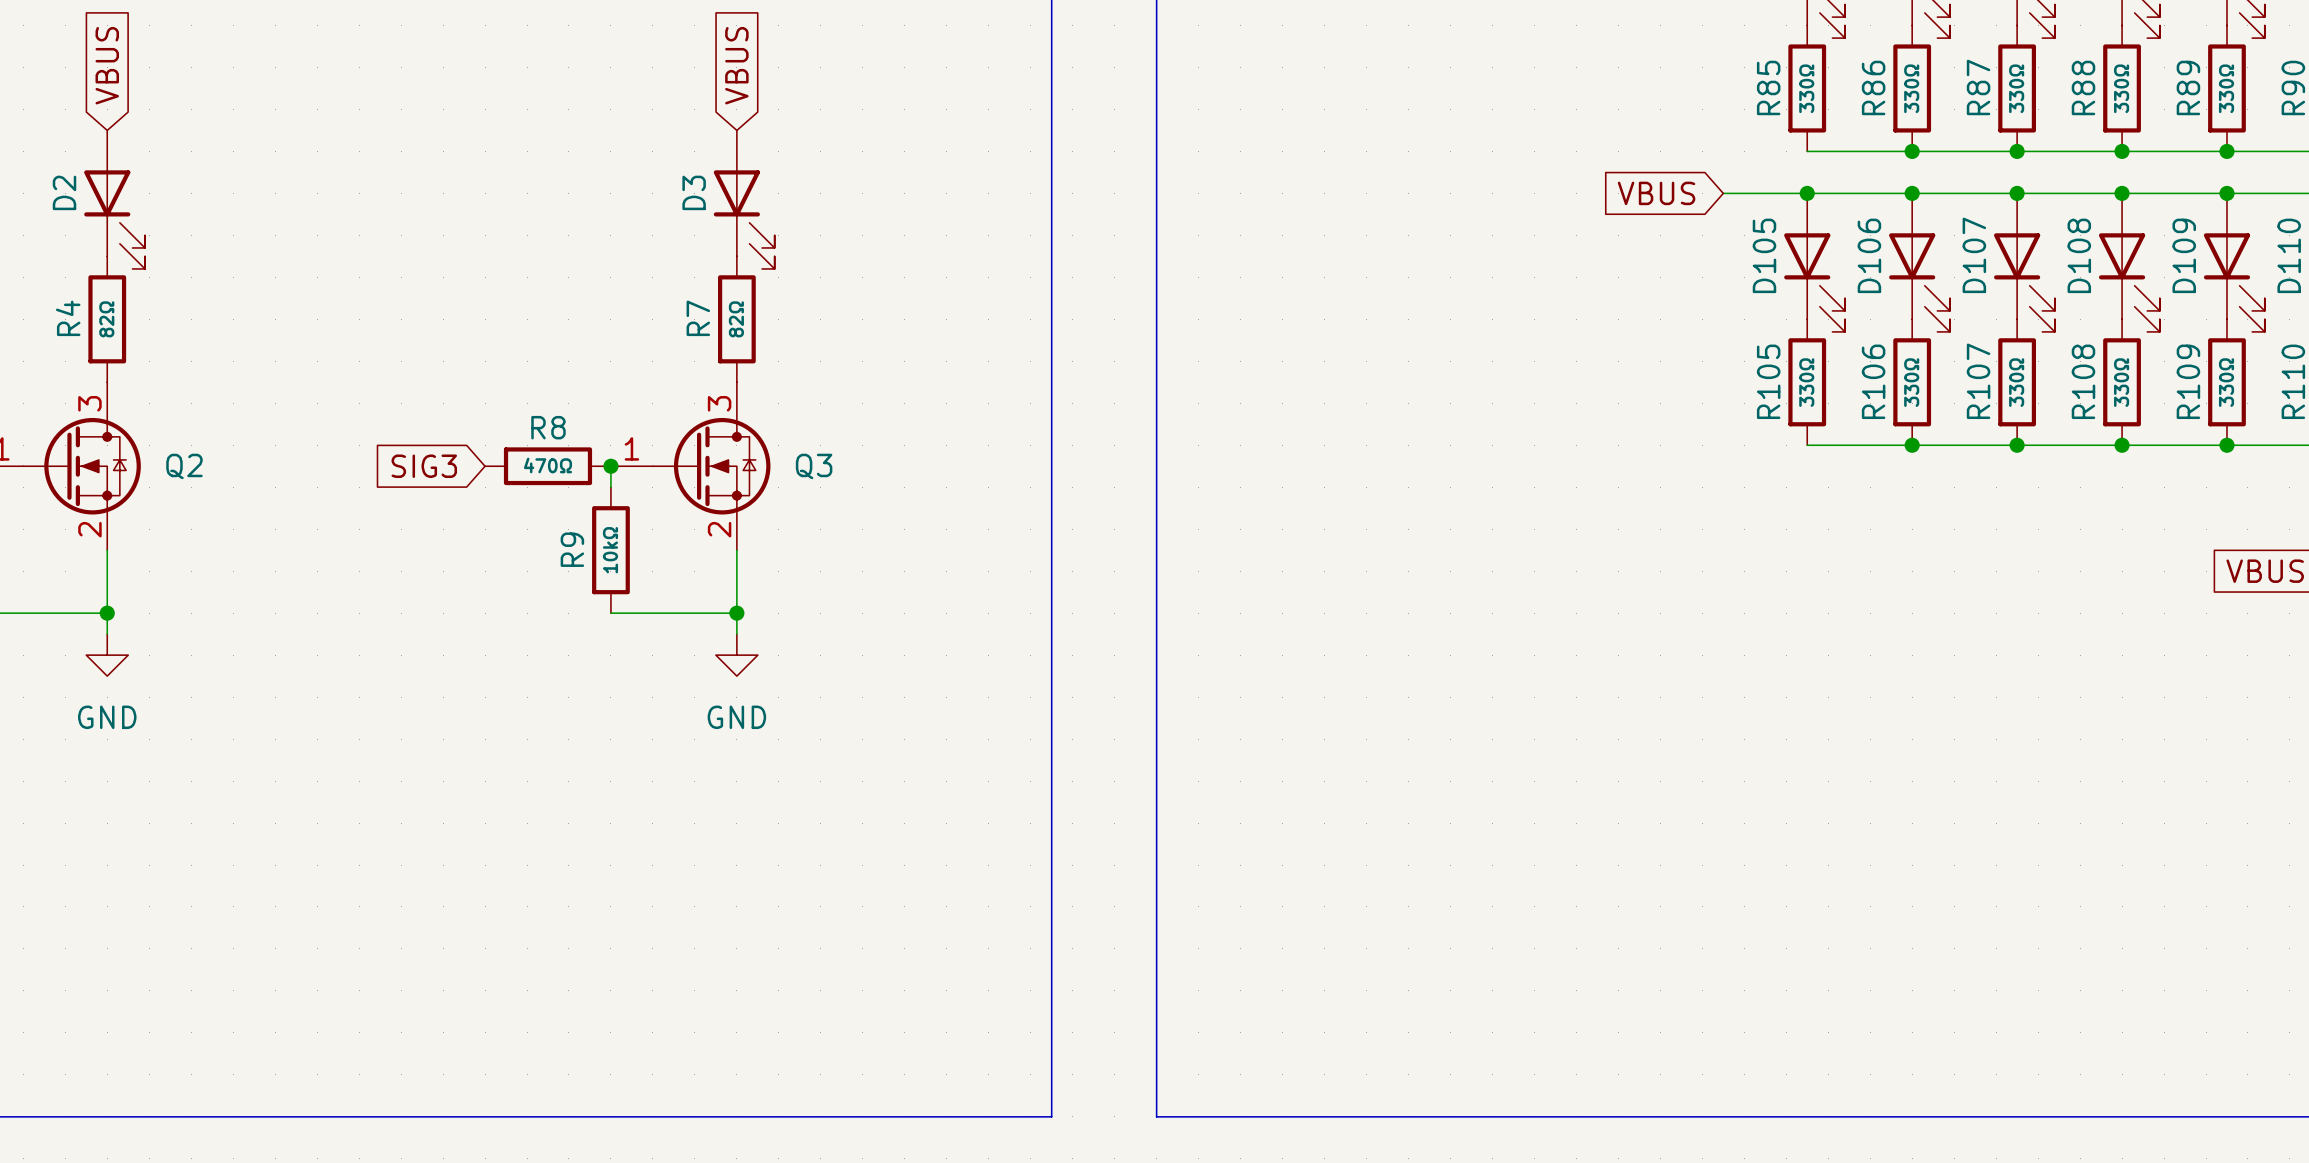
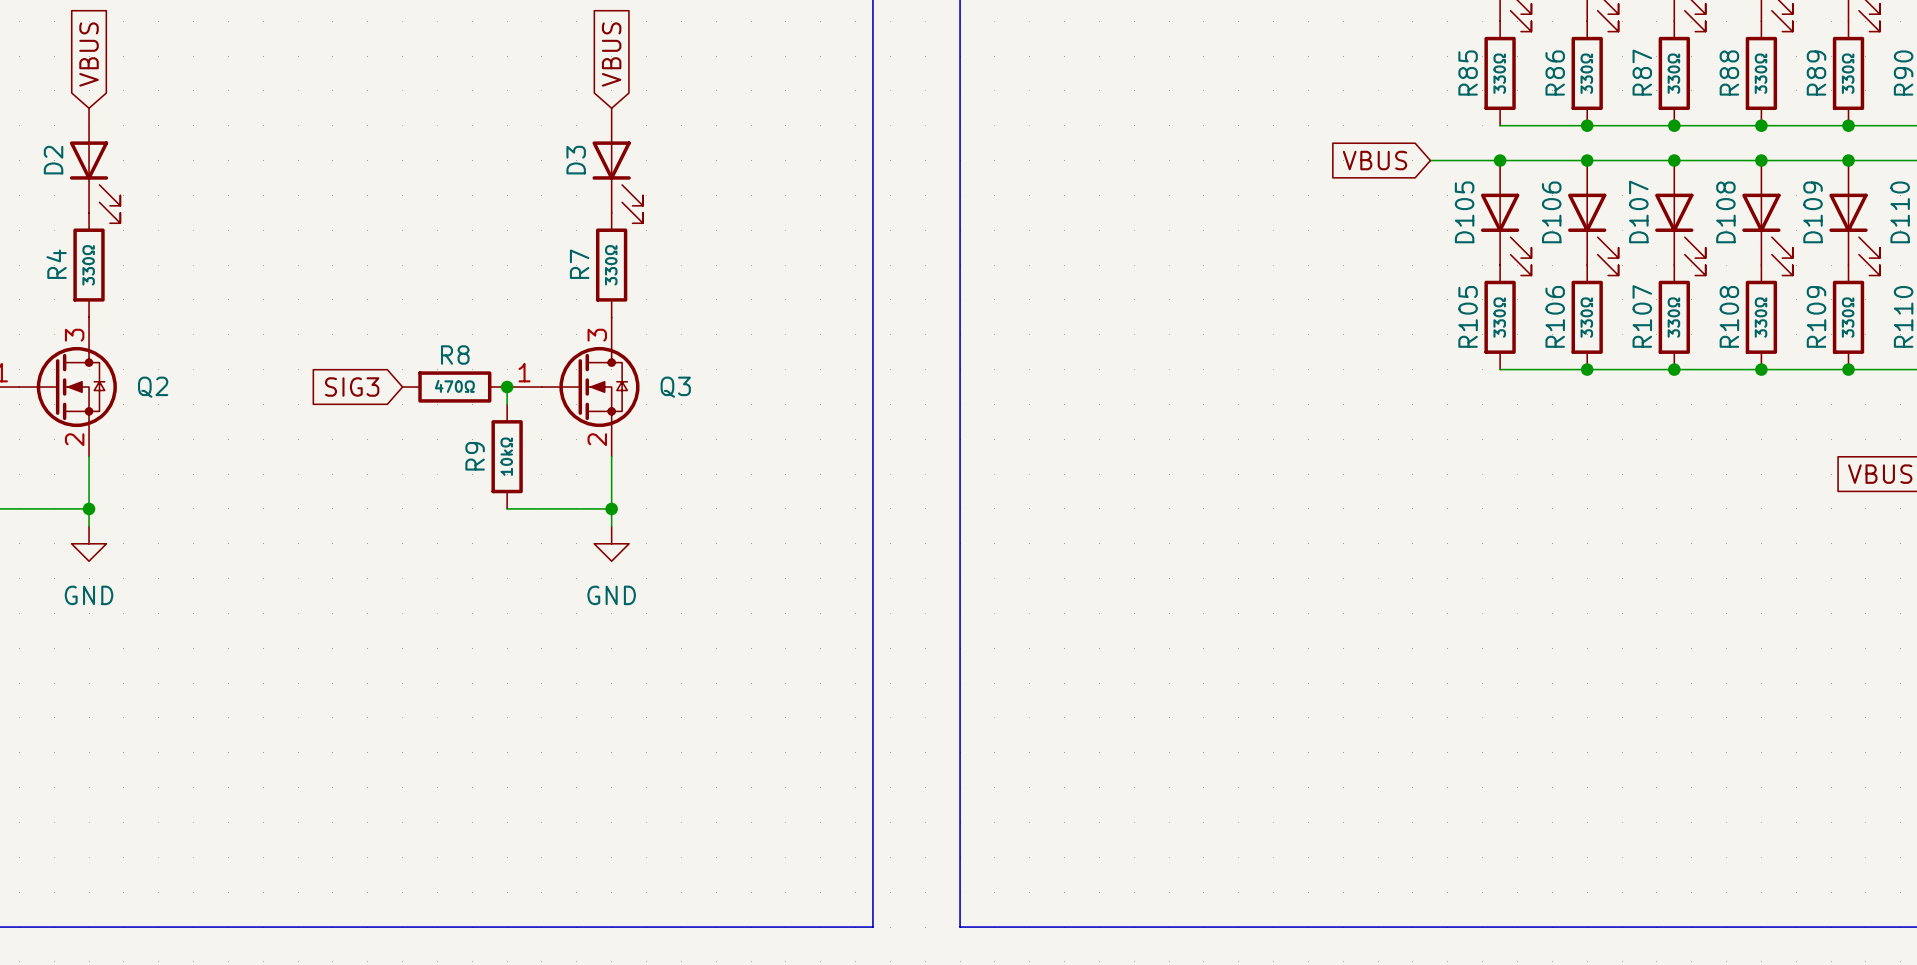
R4 value: 82Ω (106, 319) -> 330Ω (88, 265)
R7 value: 82Ω (736, 319) -> 330Ω (611, 265)

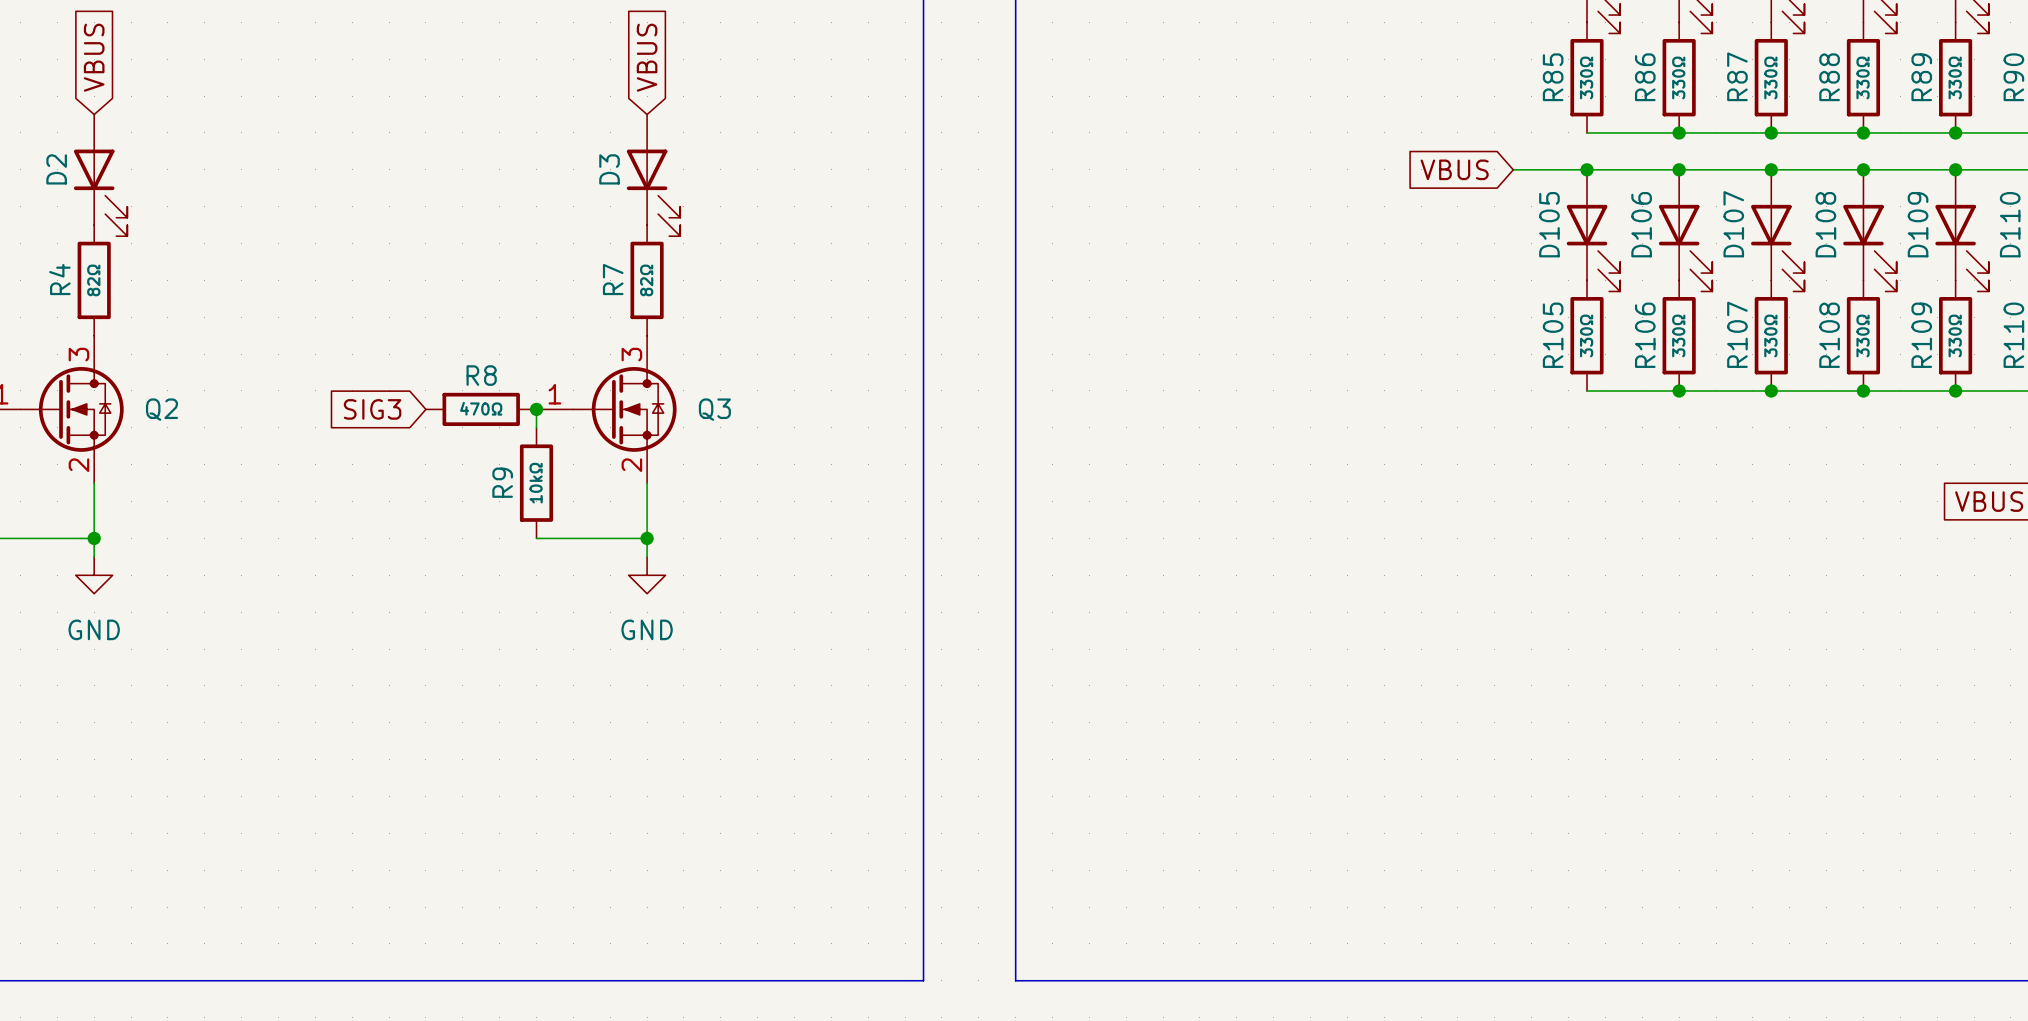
R4 value: 330Ω (88, 265) -> 82Ω (93, 280)
R7 value: 330Ω (611, 265) -> 82Ω (646, 280)

